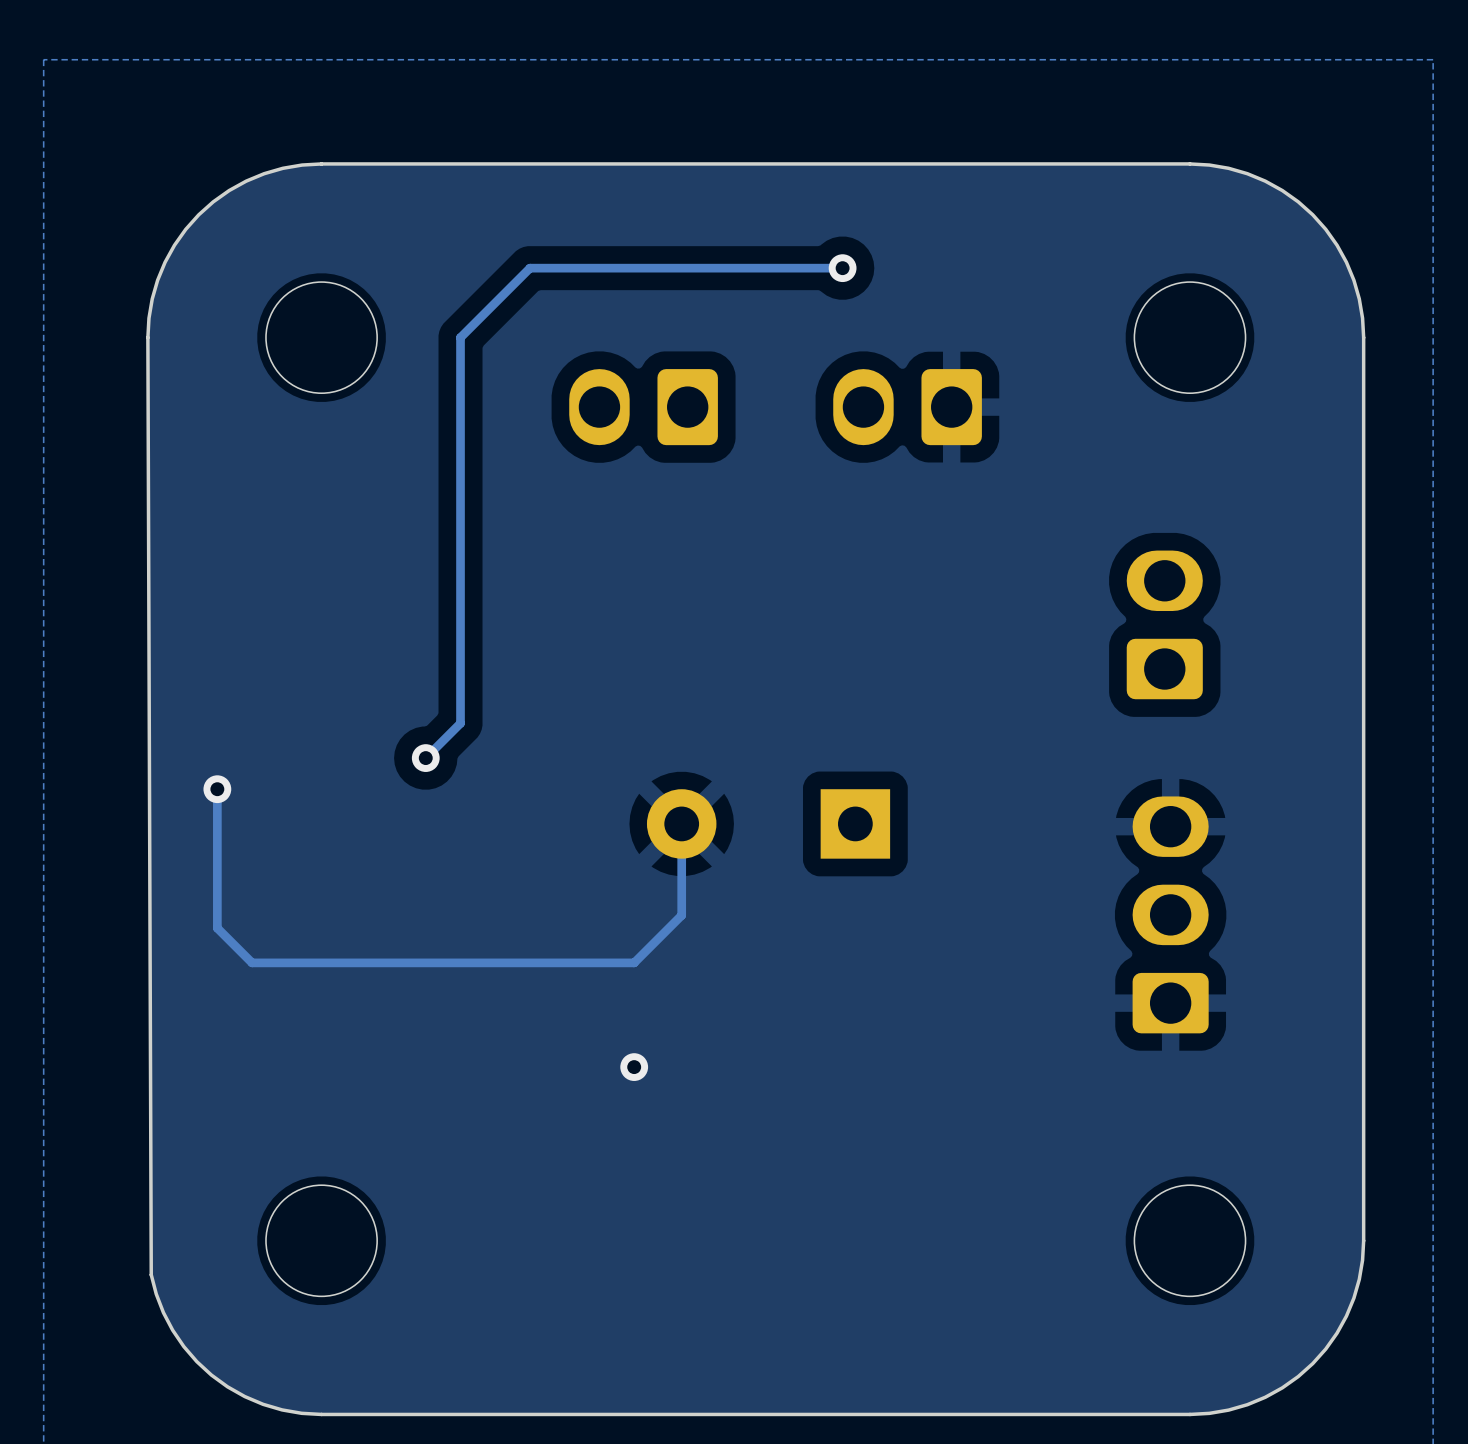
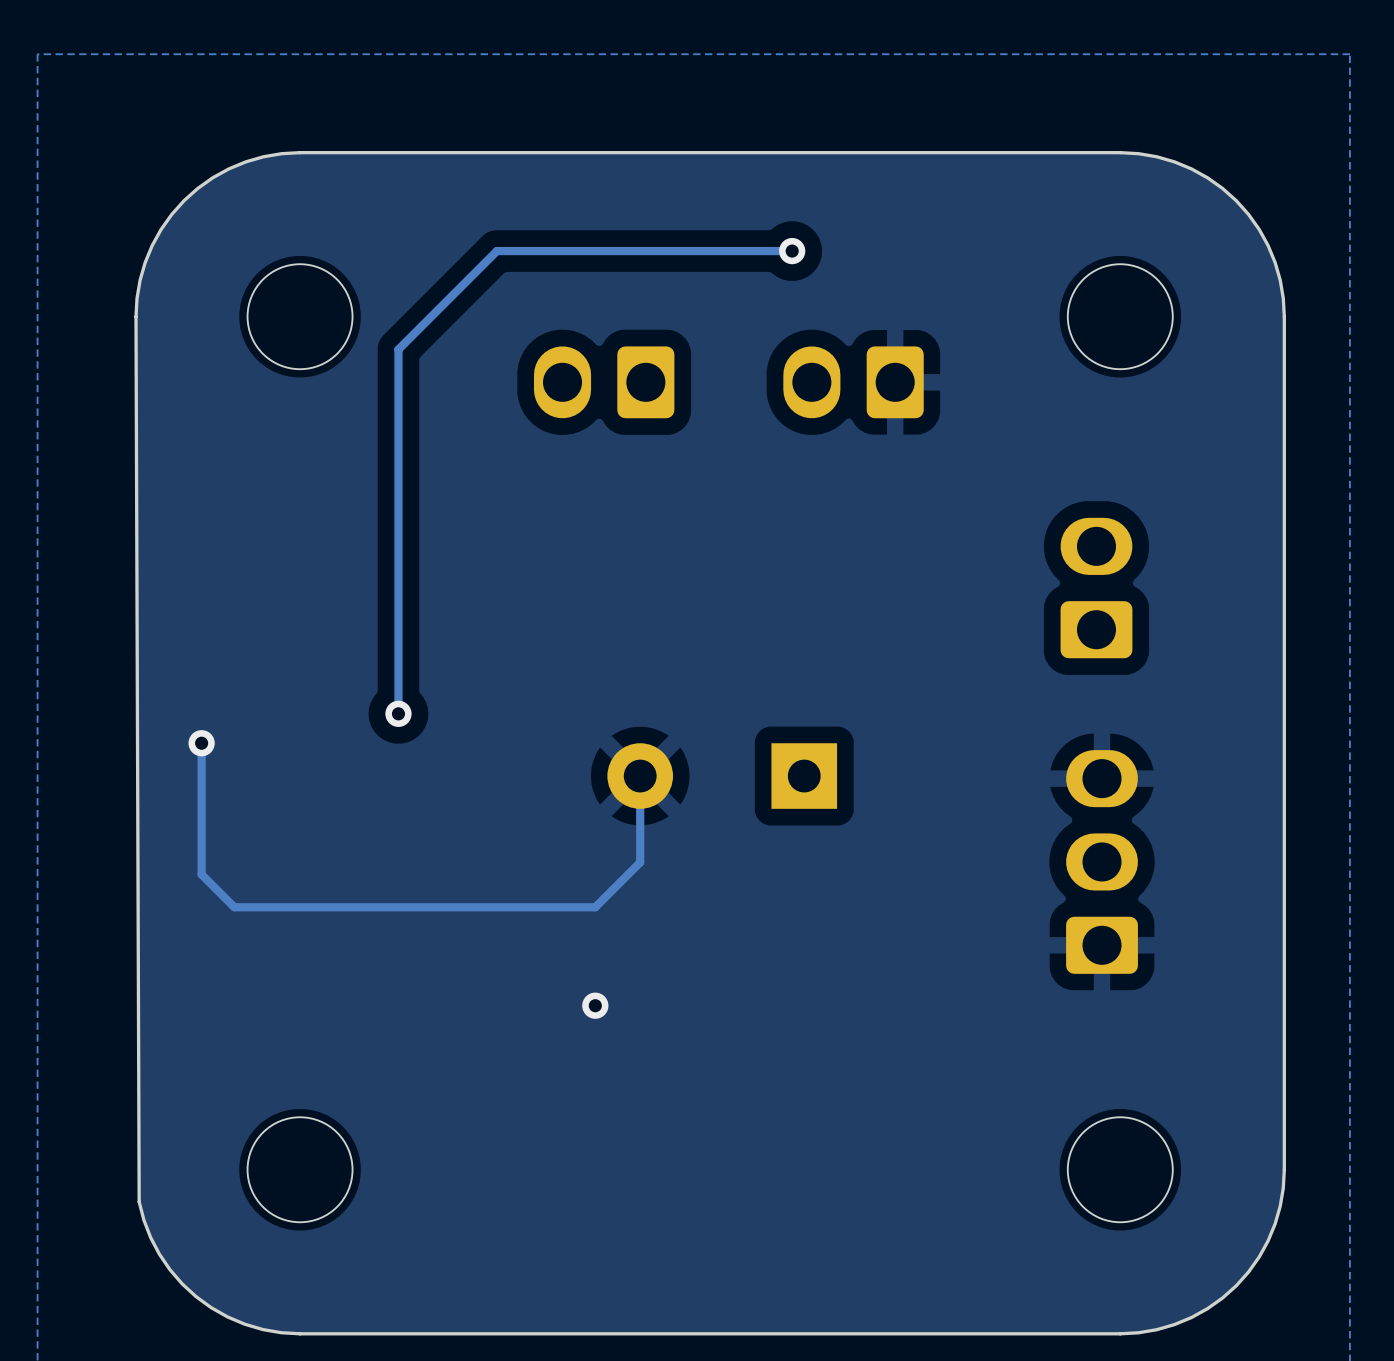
track: (460, 337) (460, 723) (425, 758) -> (431, 316) (398, 349) (398, 713)

